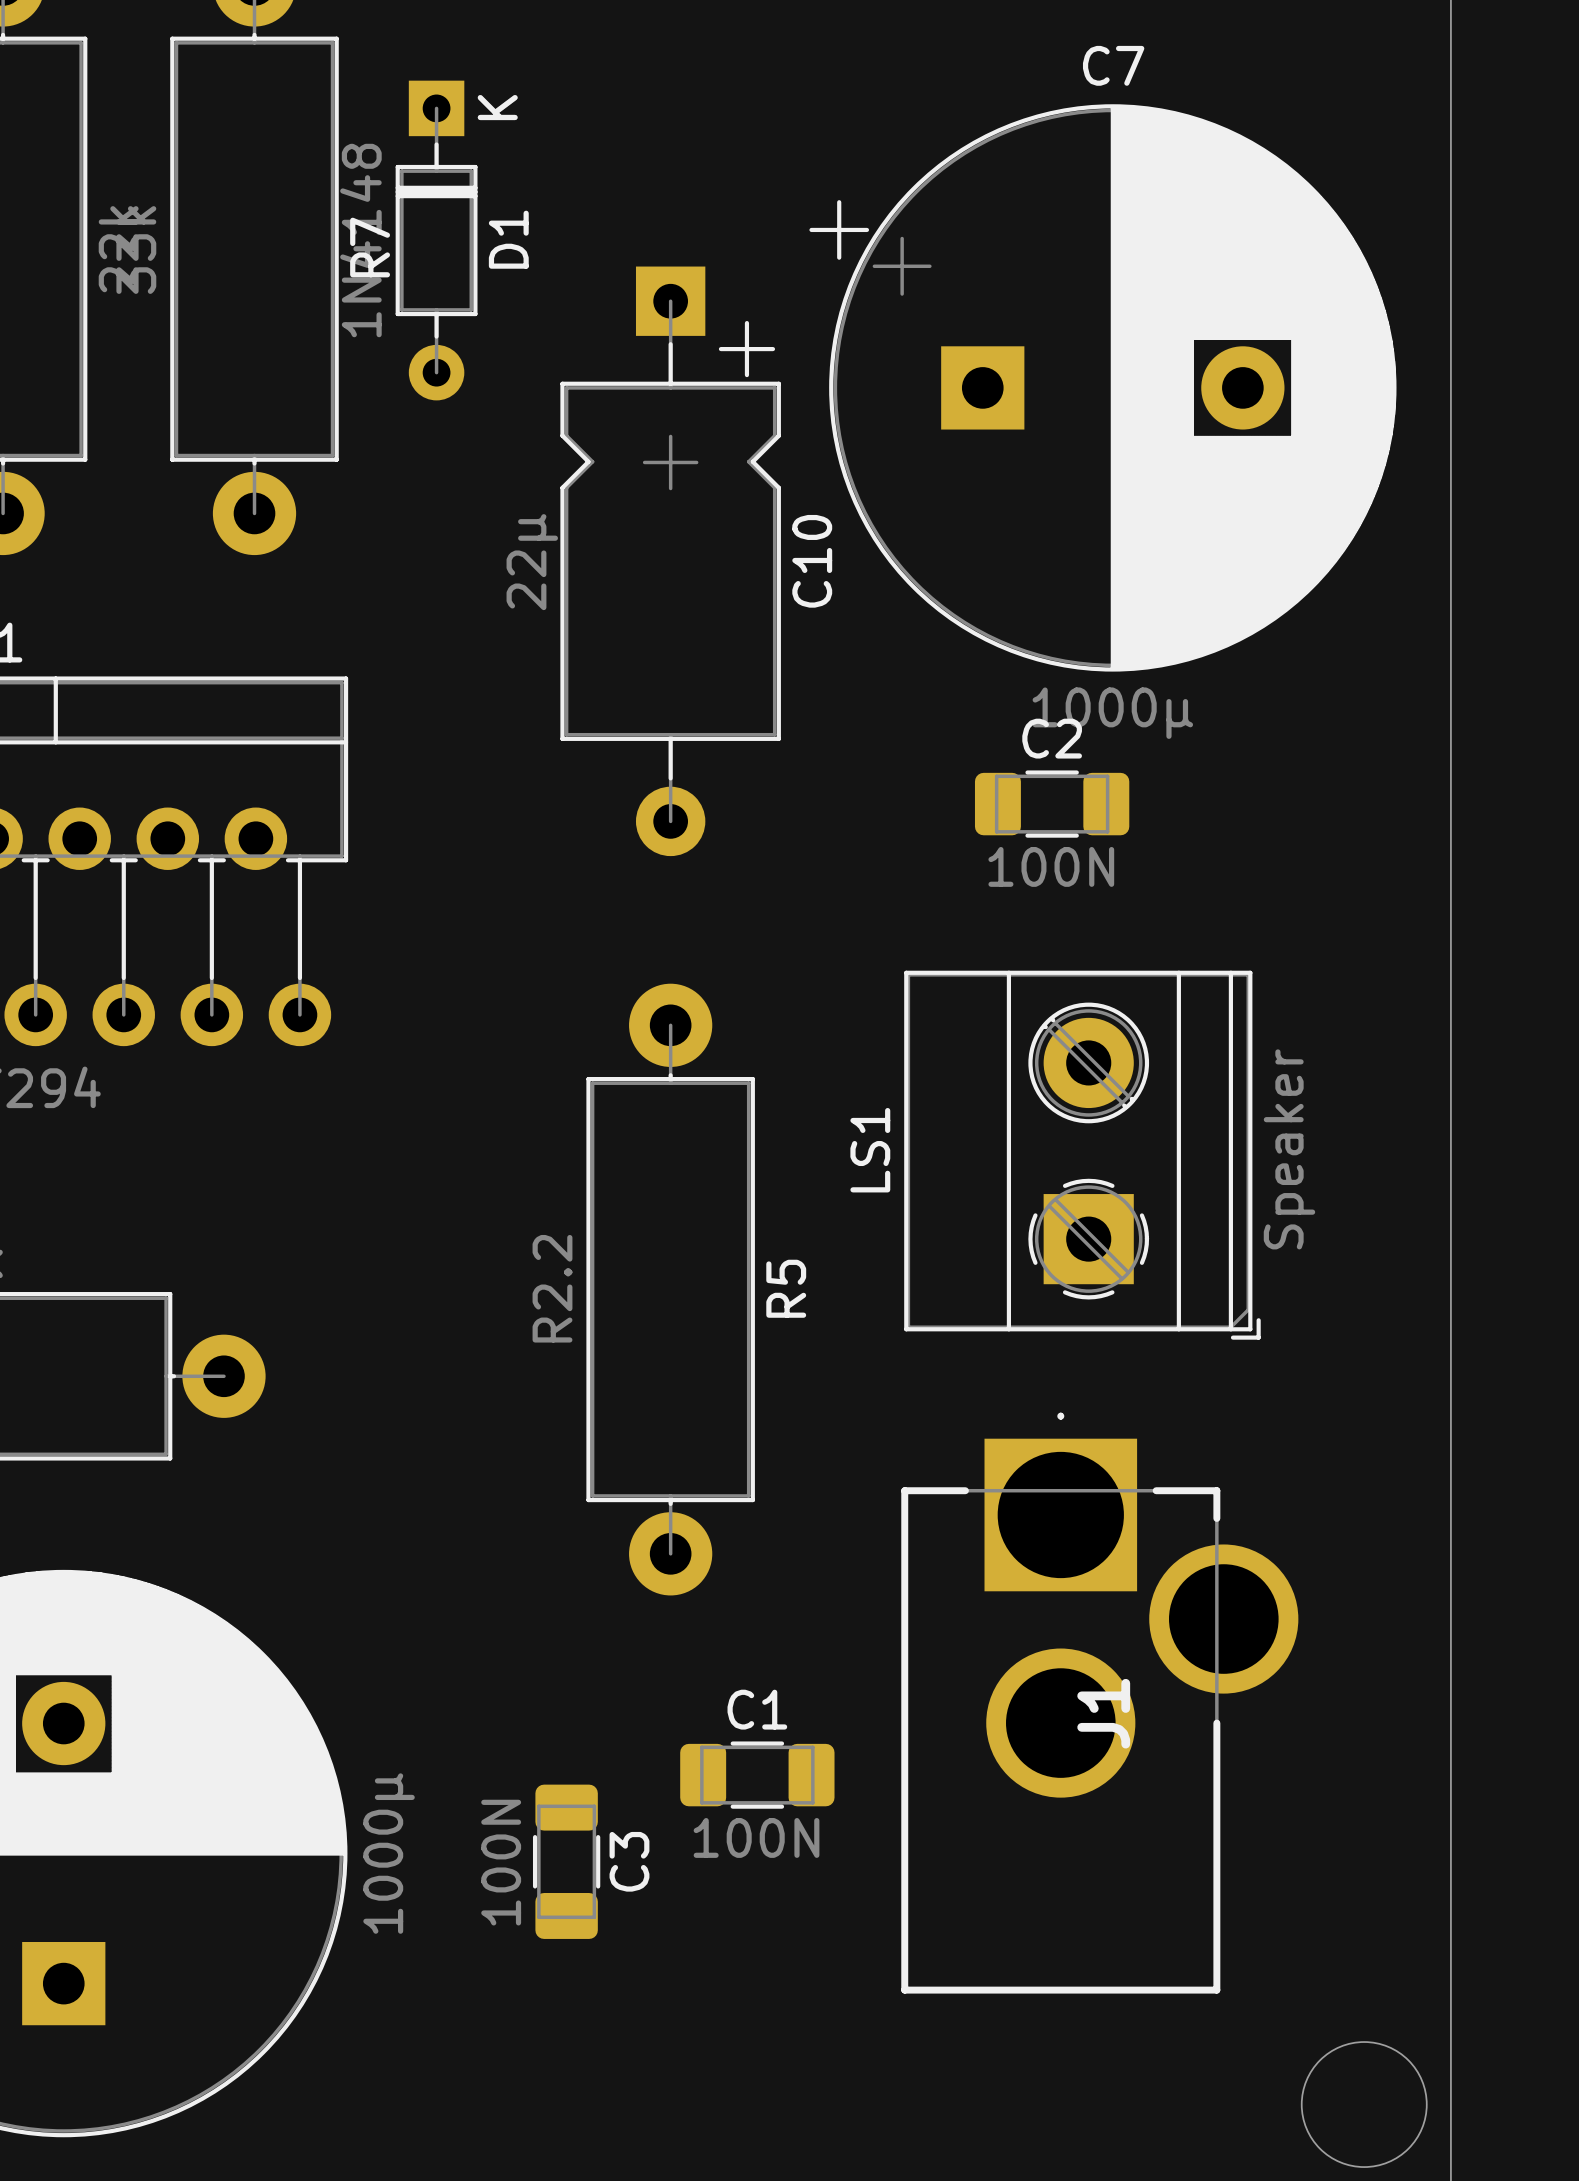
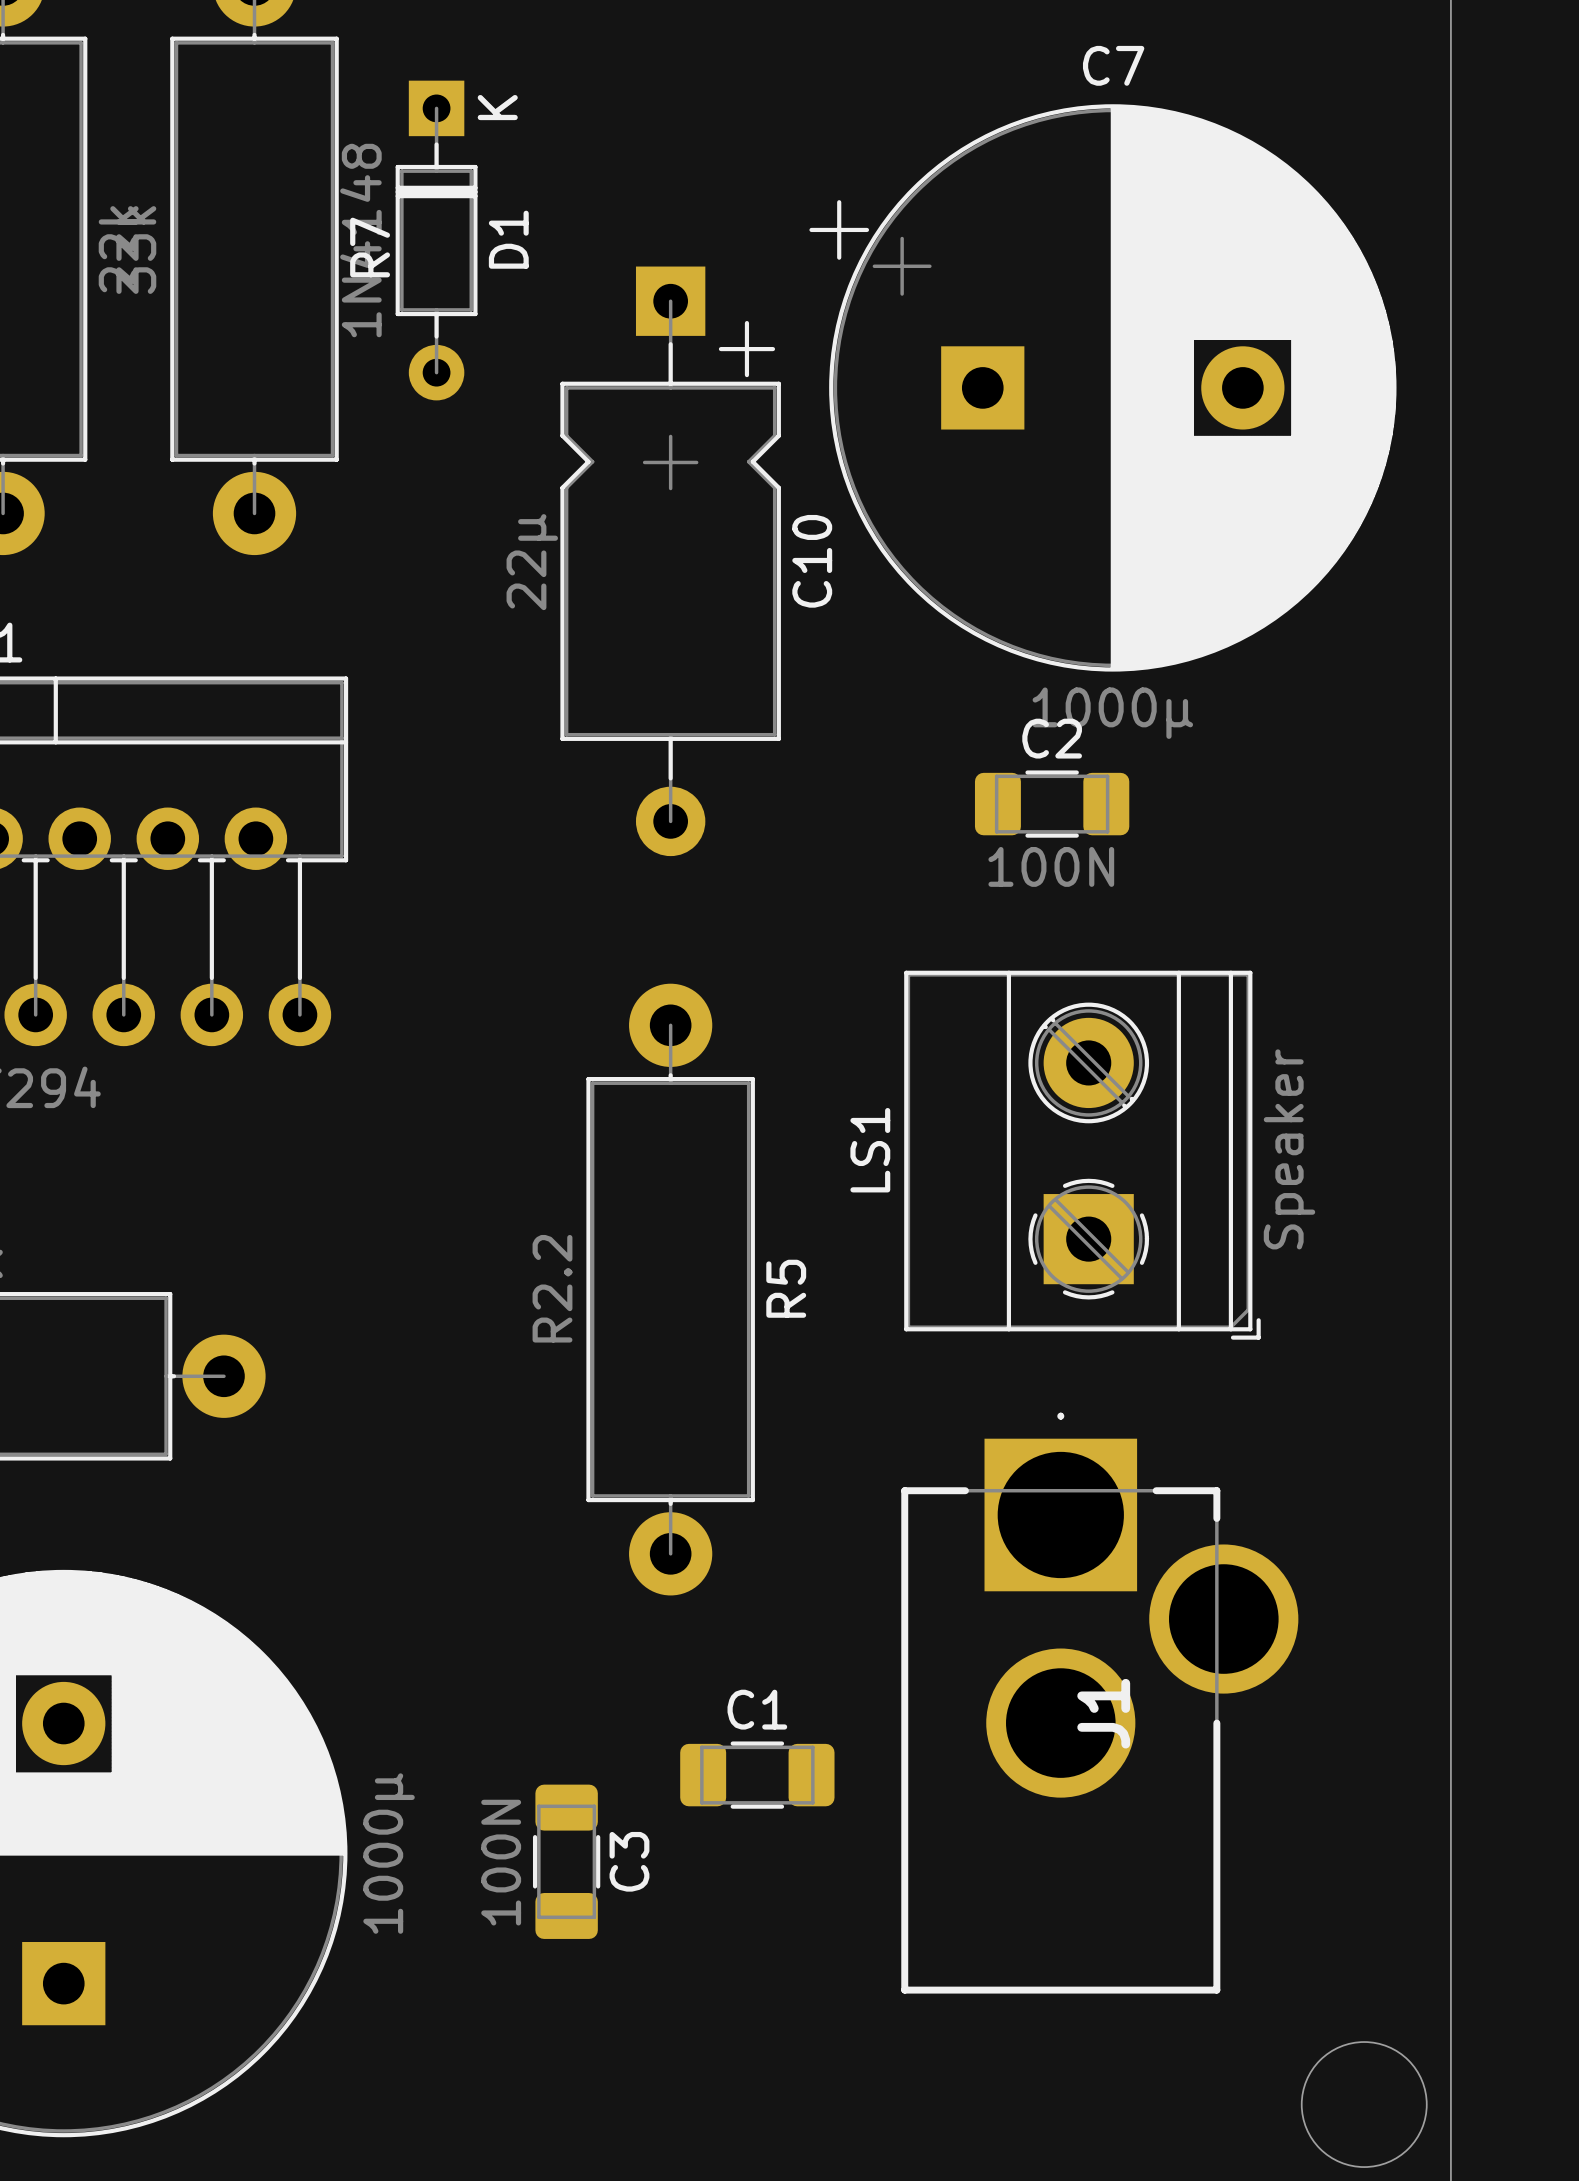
C1 value: 100N (756, 1837) -> none

